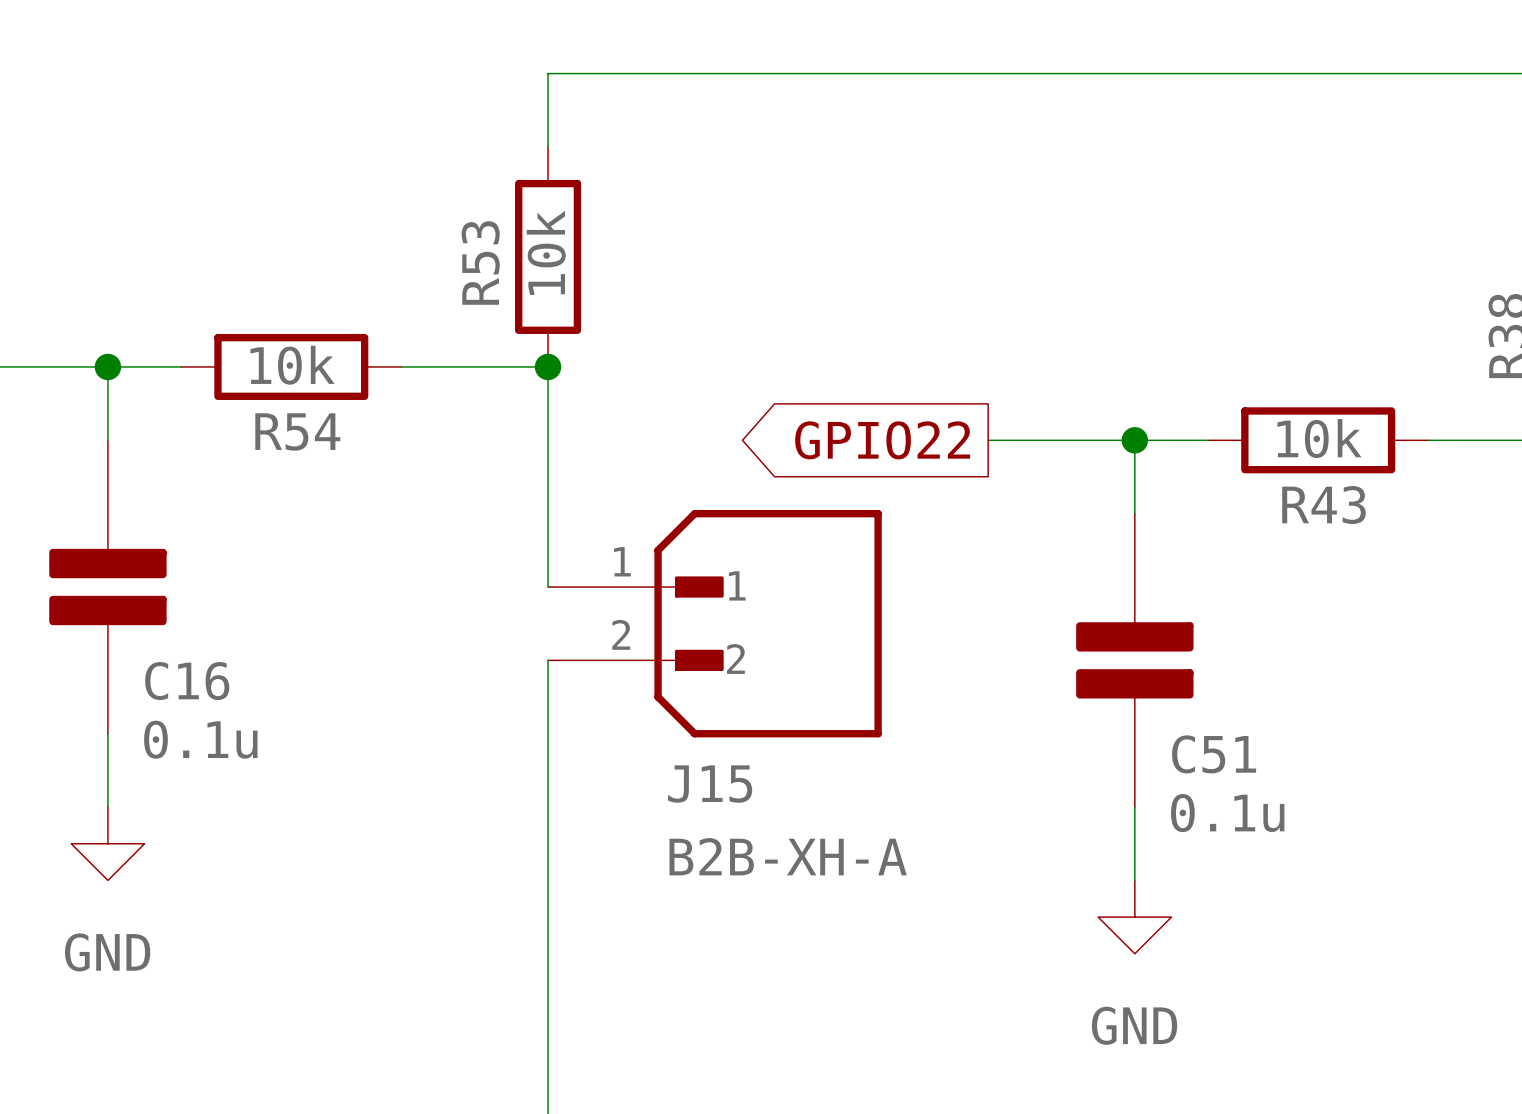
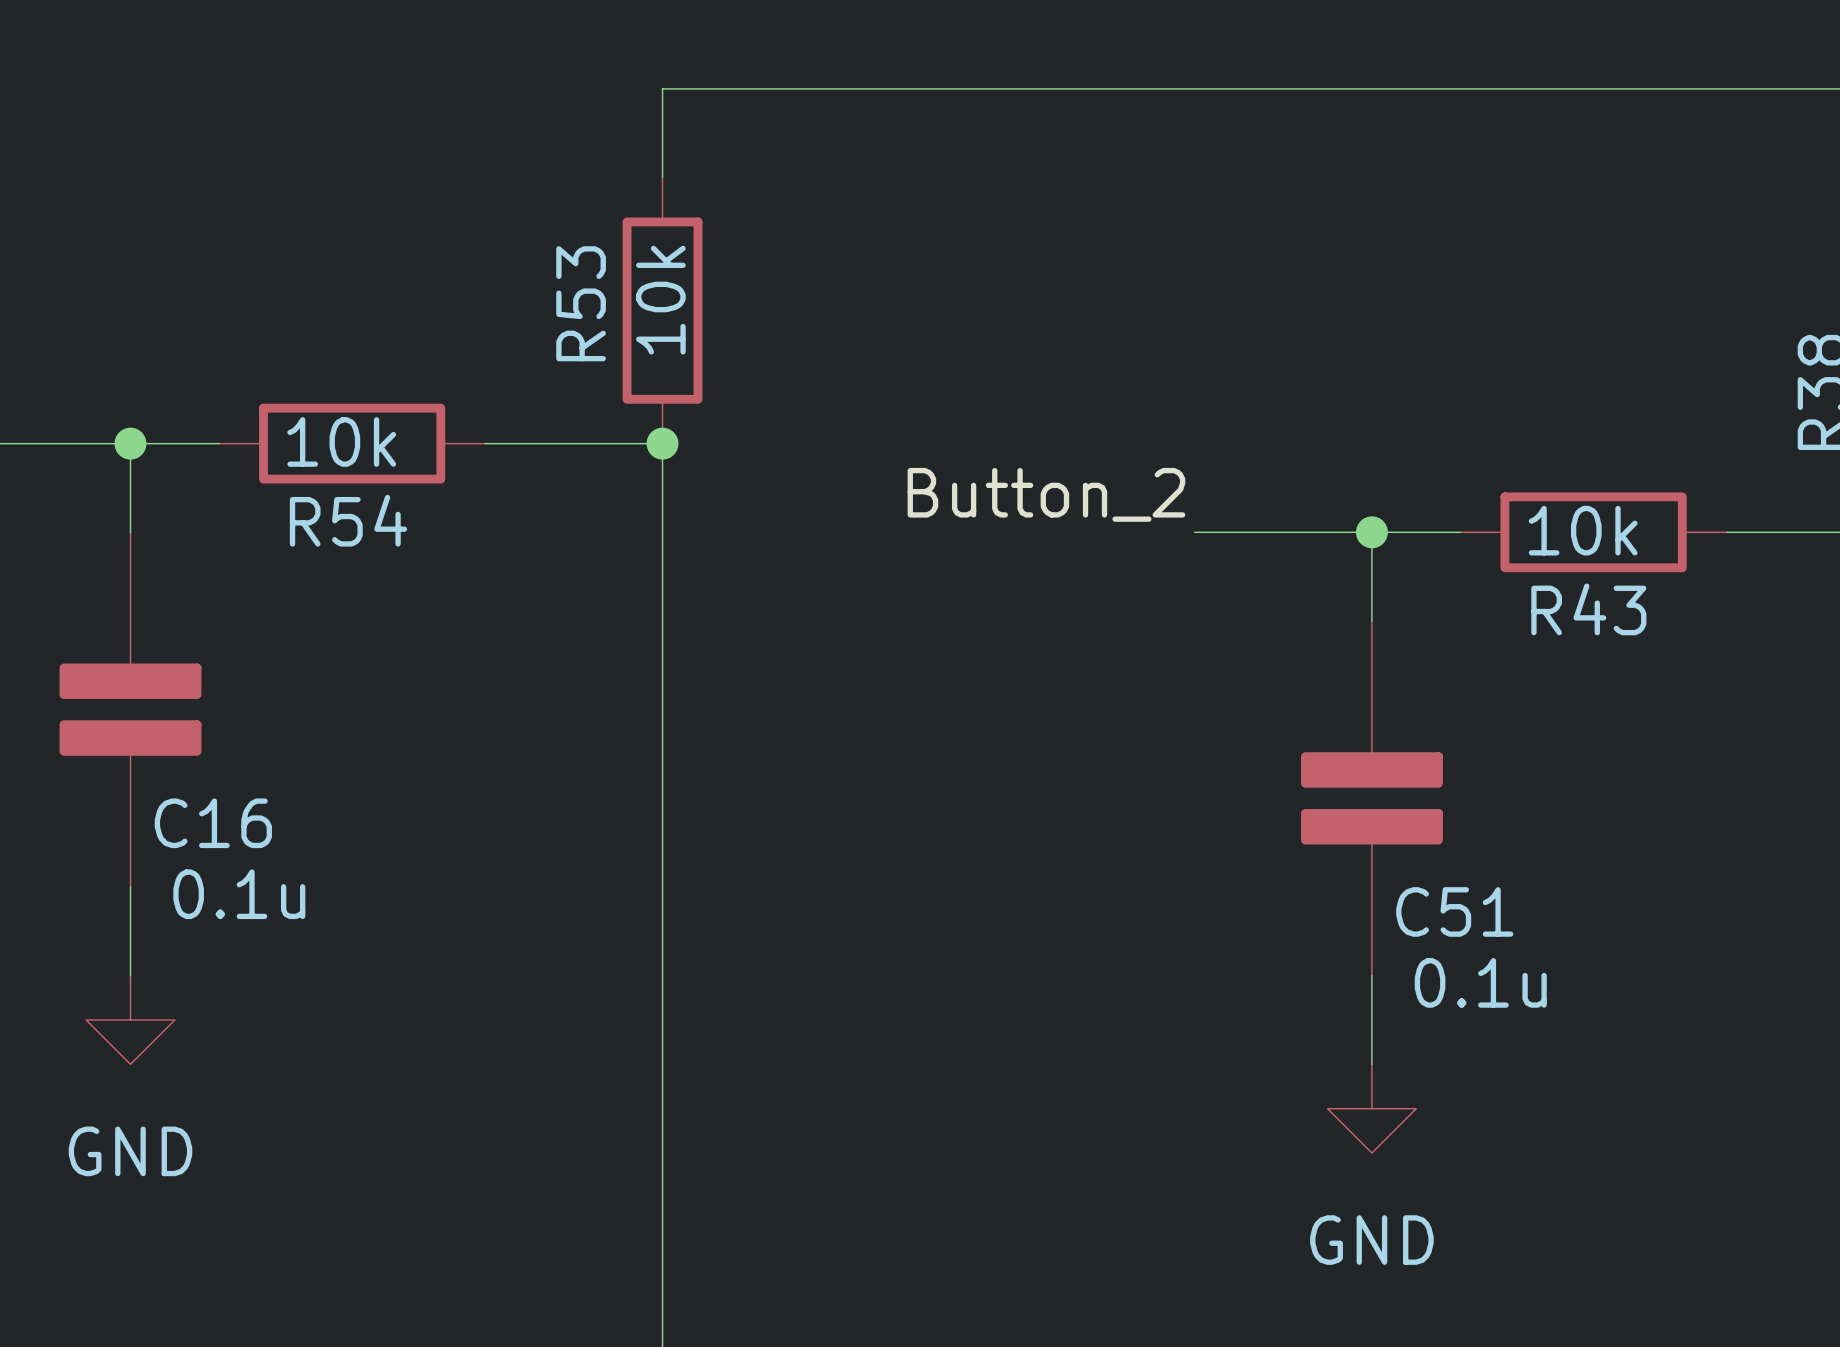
label: none -> Button_2 (1046, 494)
global label: GPIO22 (882, 440) -> none
wire: none -> (662, 709) (662, 798)
J15: B2B-XH-A (714, 623) -> none

